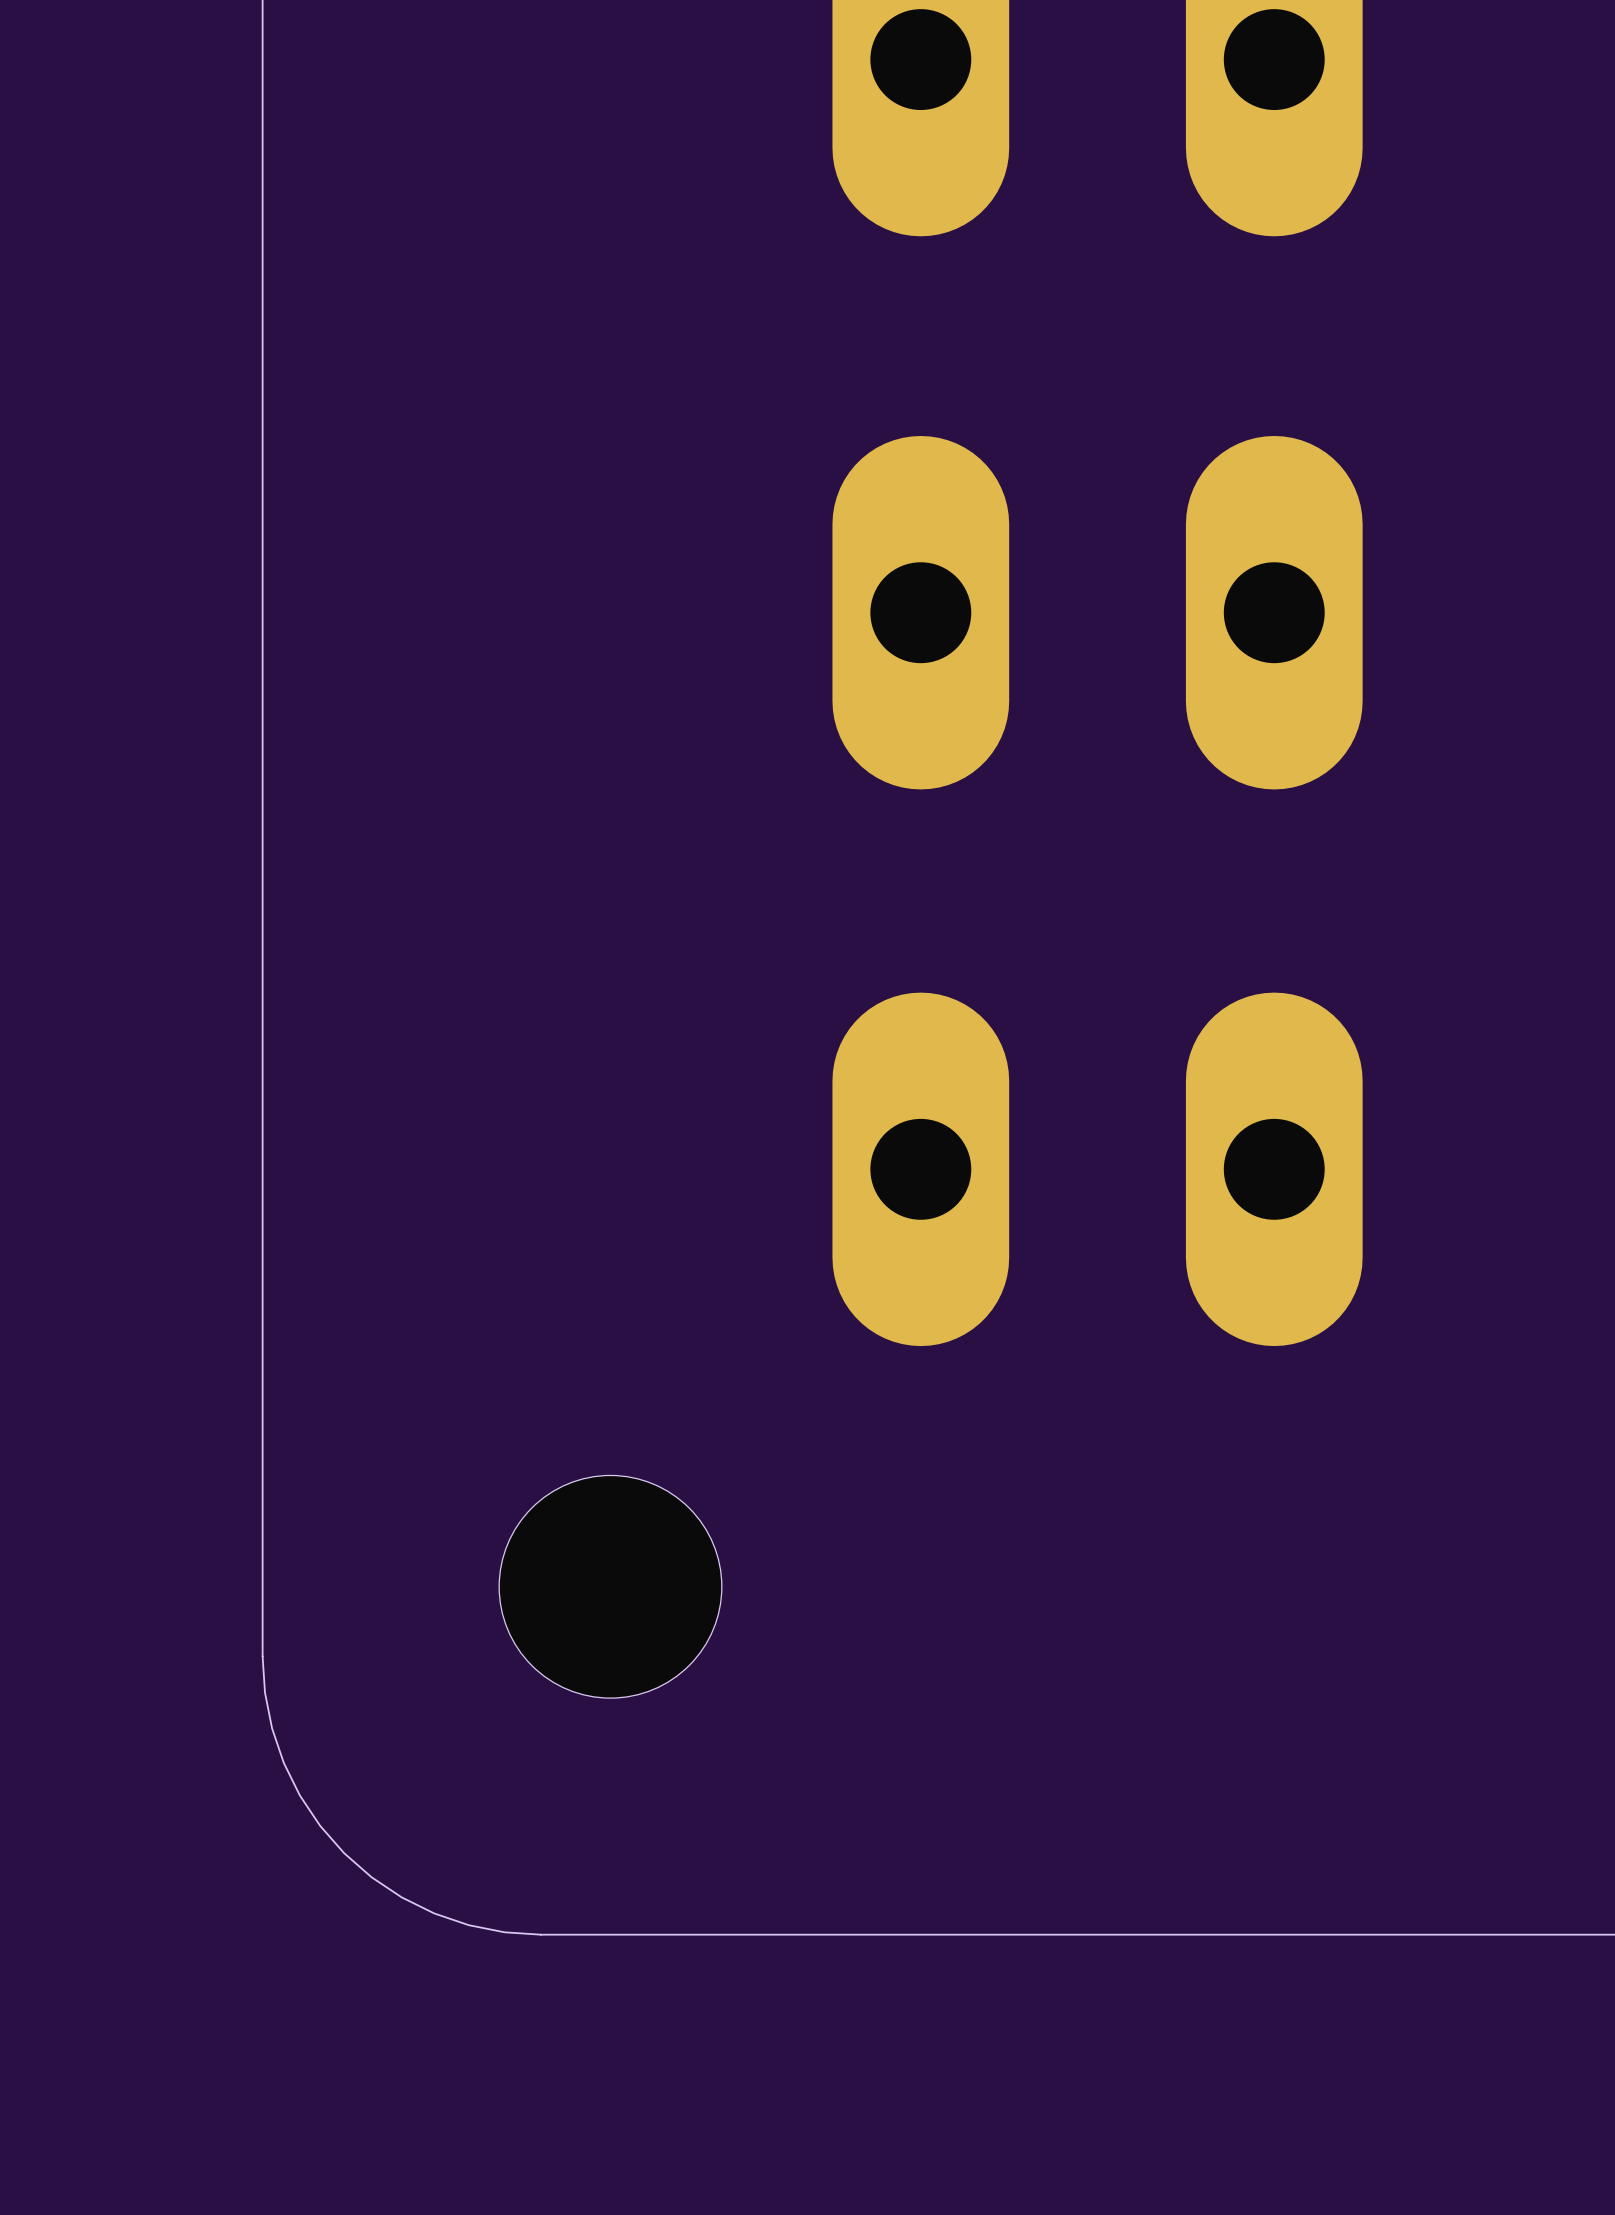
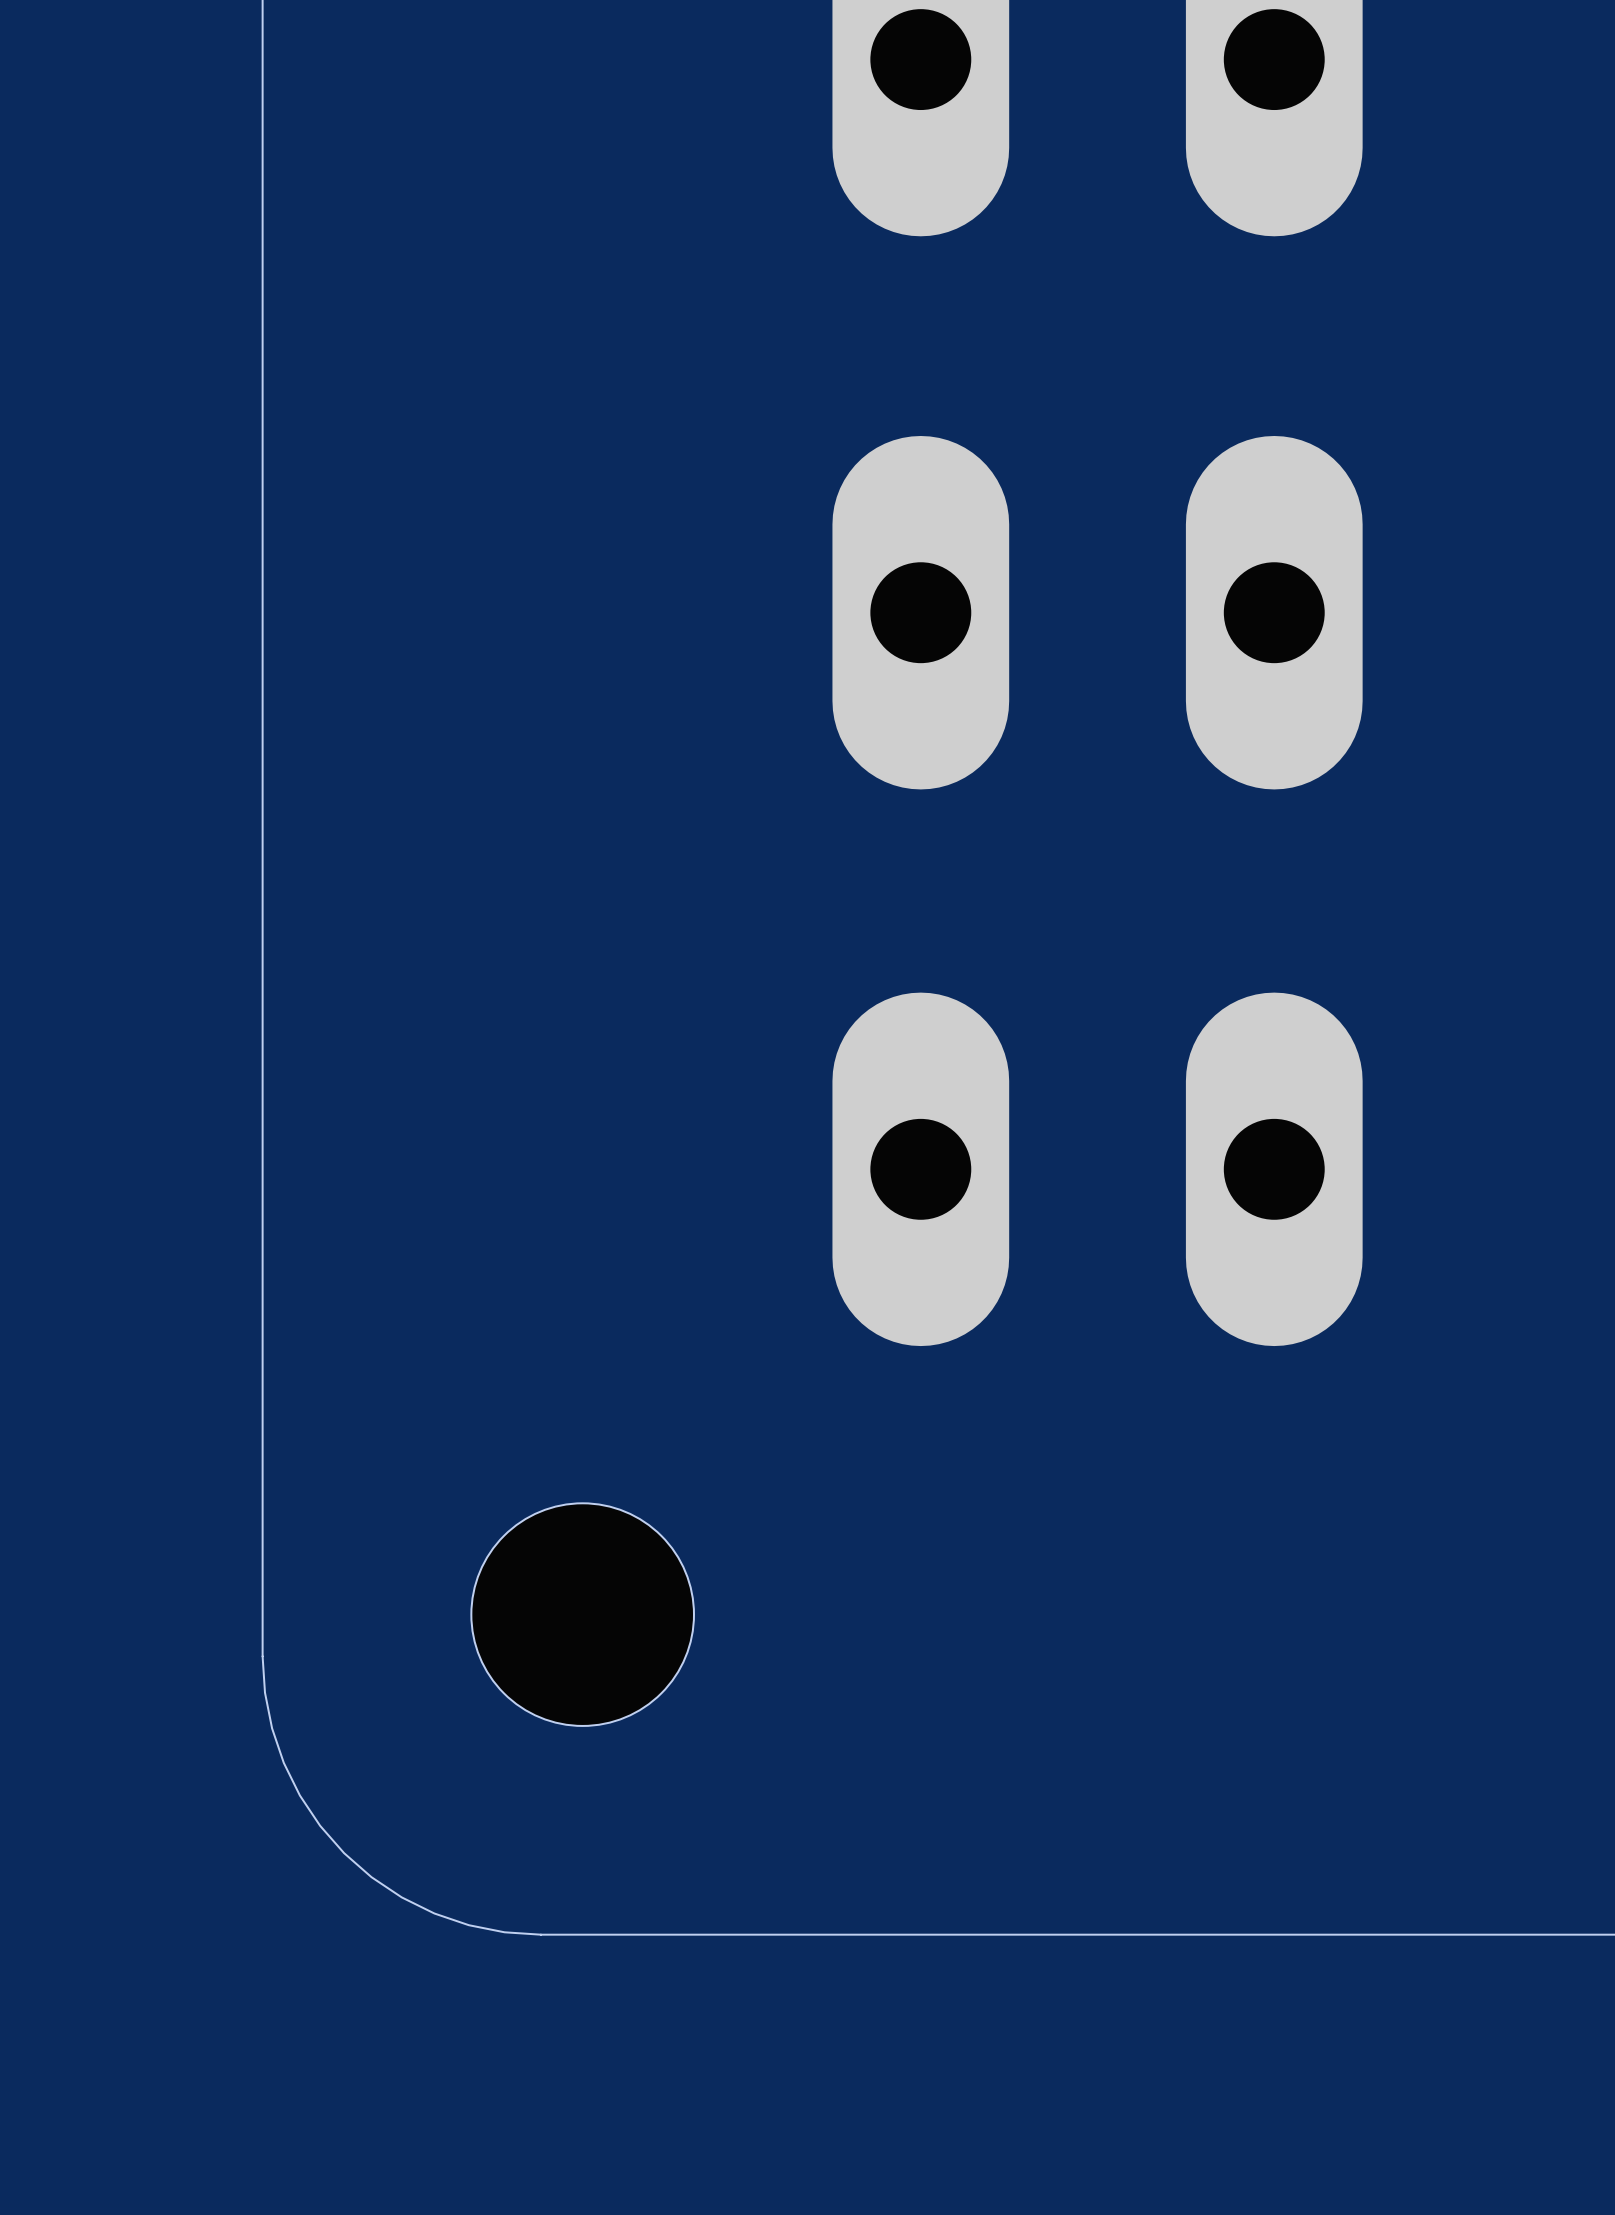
part position: (610, 1586) -> (582, 1614)

